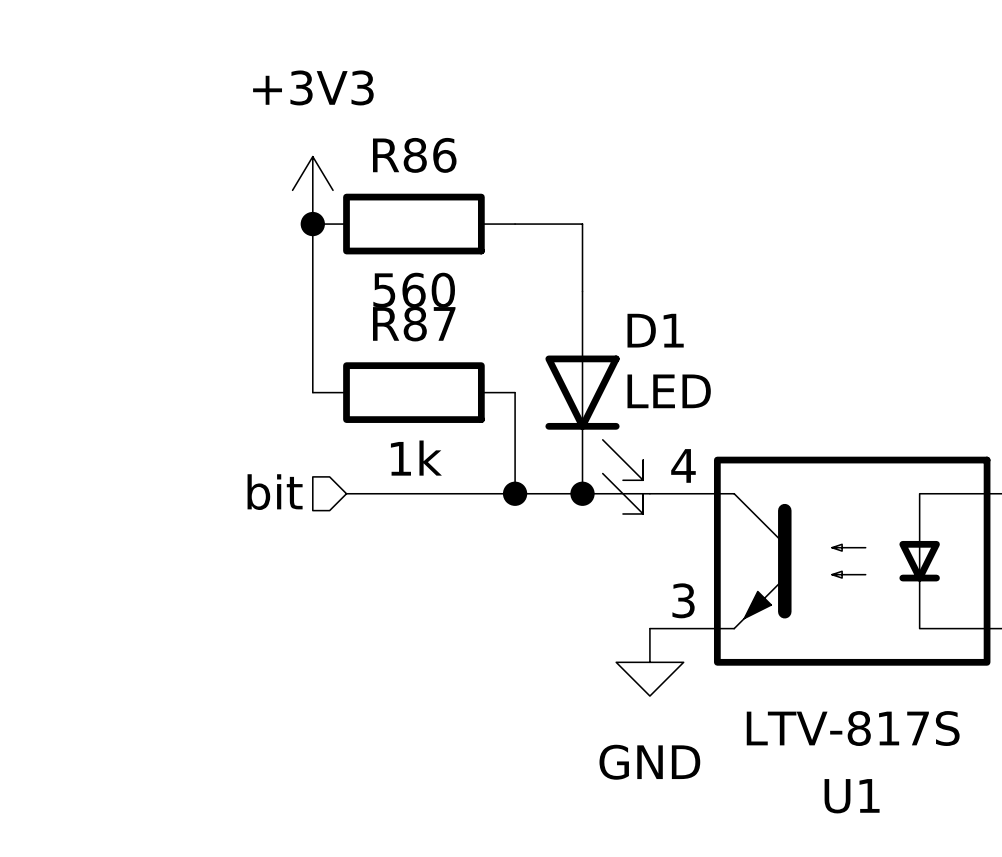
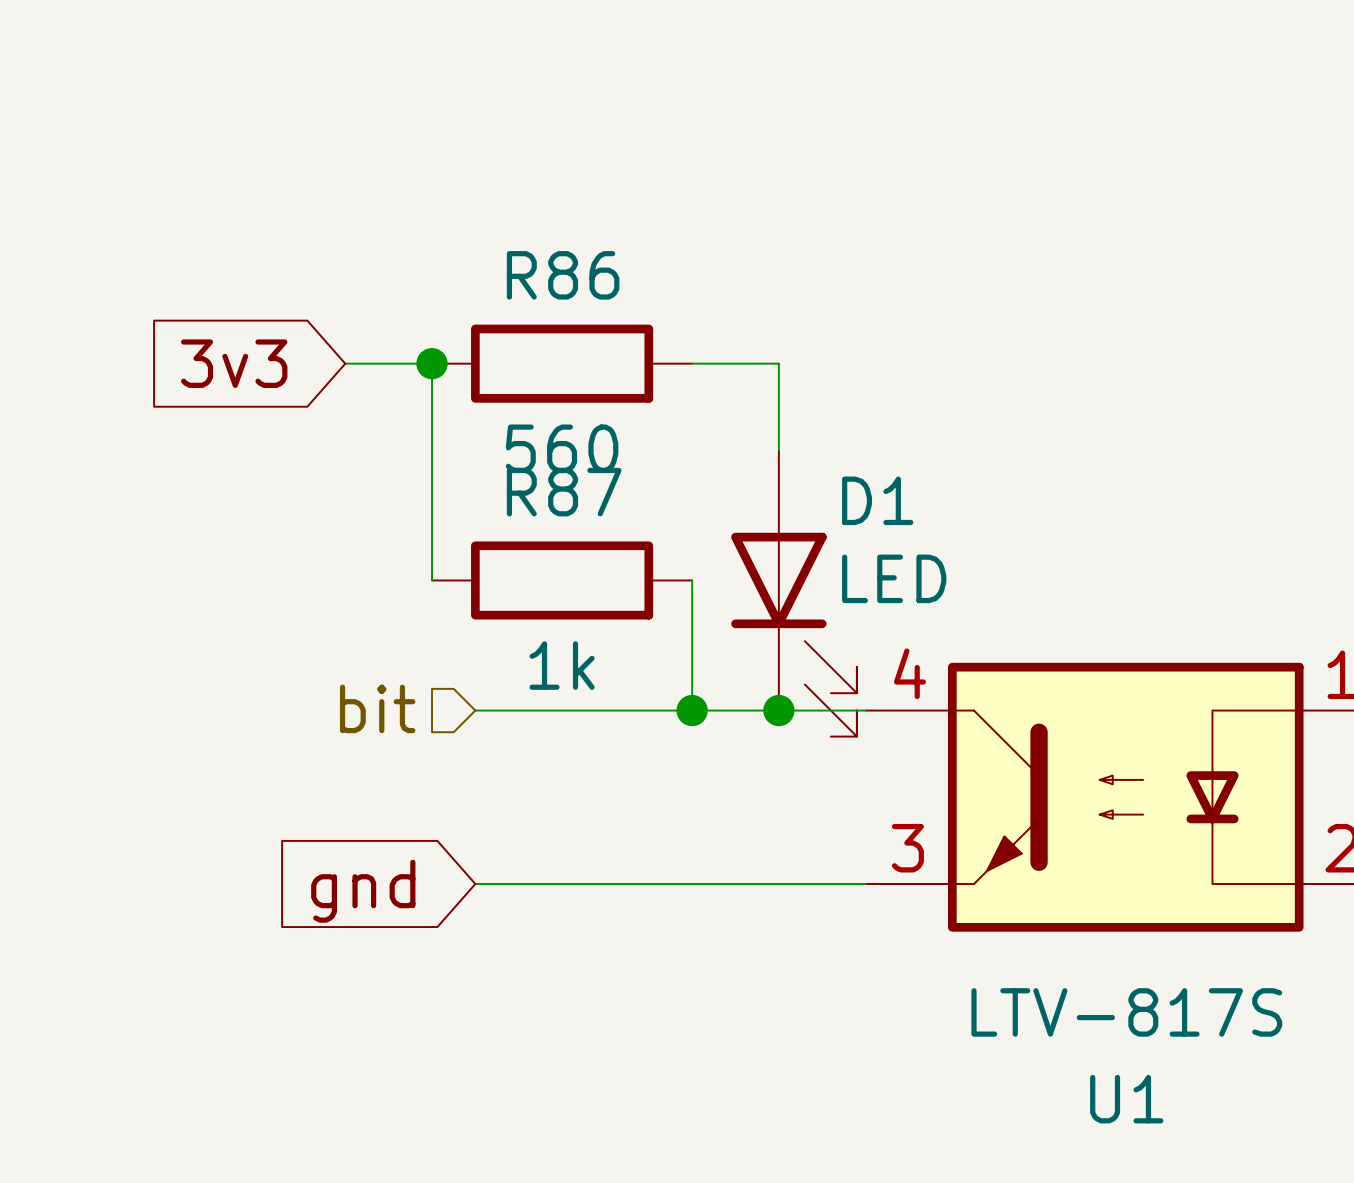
power symbol: +3V3 (312, 190) -> none
global label: none -> 3v3 (234, 363)
wire: none -> (345, 363) (432, 363)
wire: none -> (475, 883) (865, 883)
global label: none -> gnd (363, 891)
power symbol: GND (649, 662) -> none

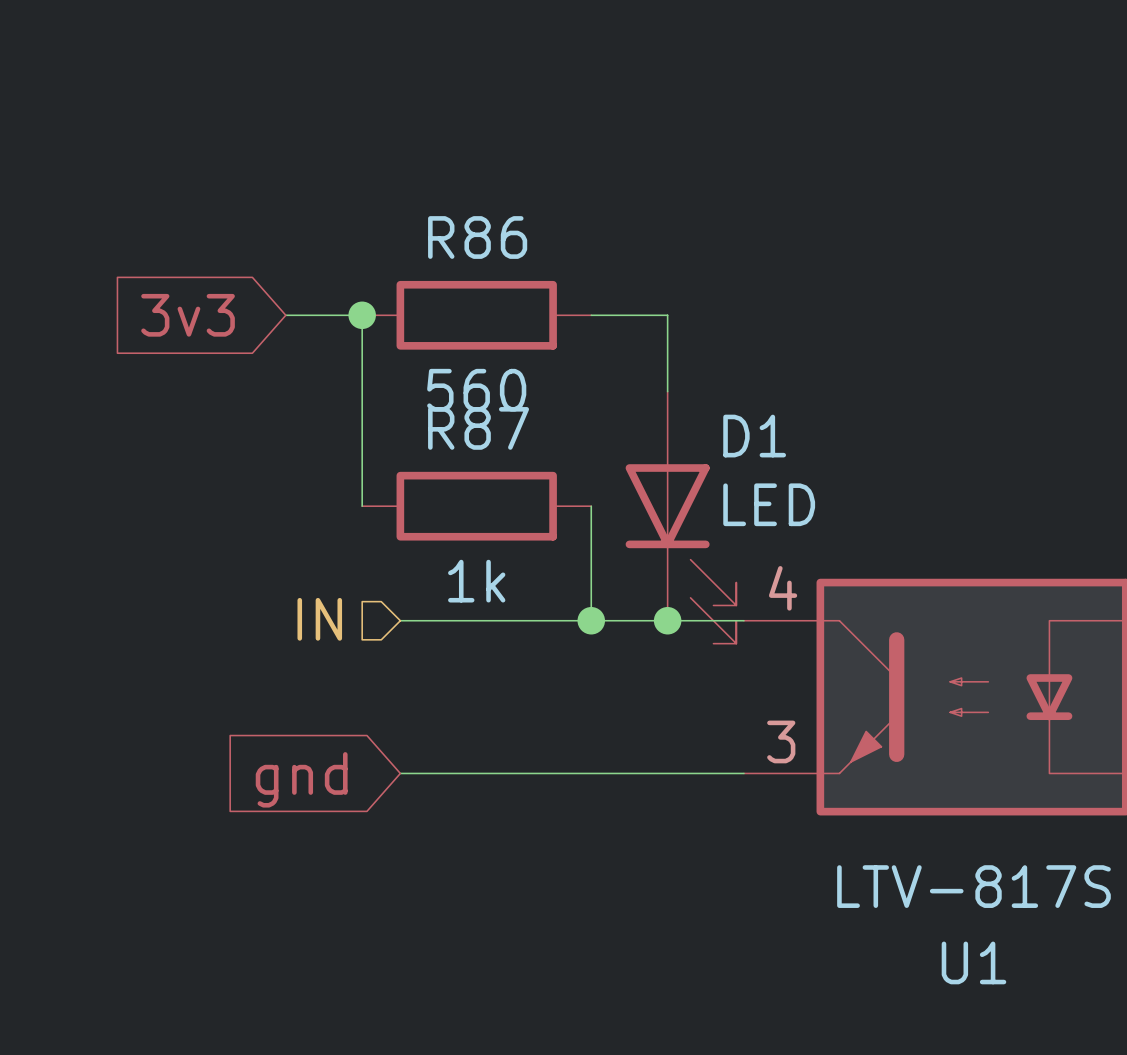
hierarchical label: bit (377, 708) -> IN (319, 619)

